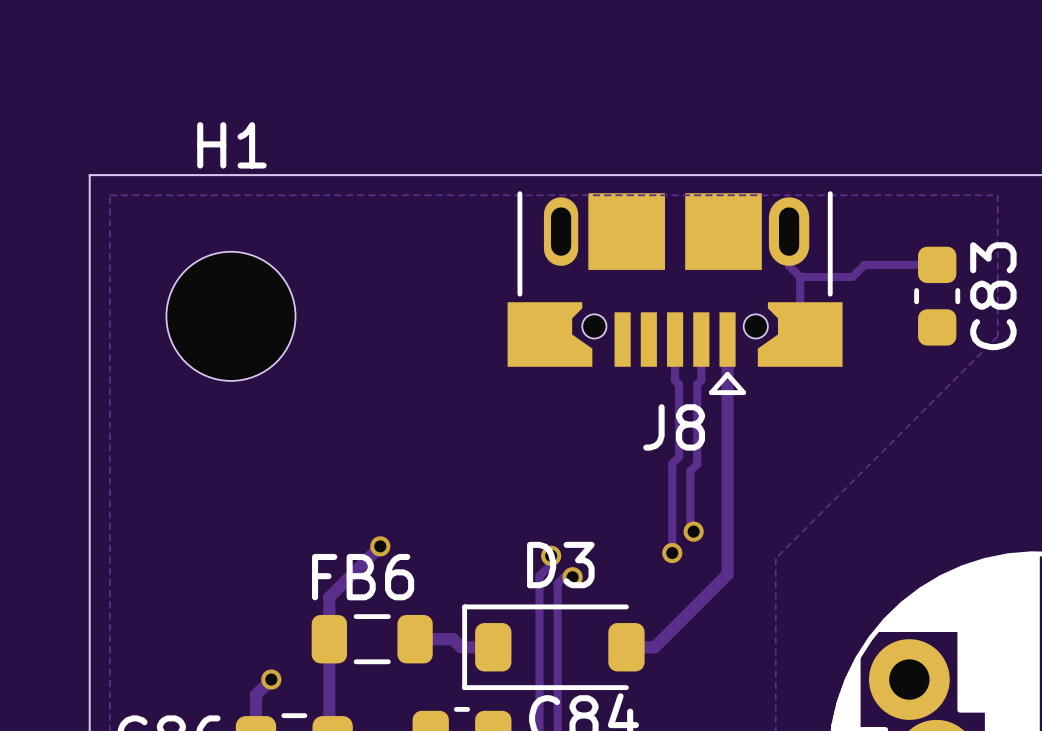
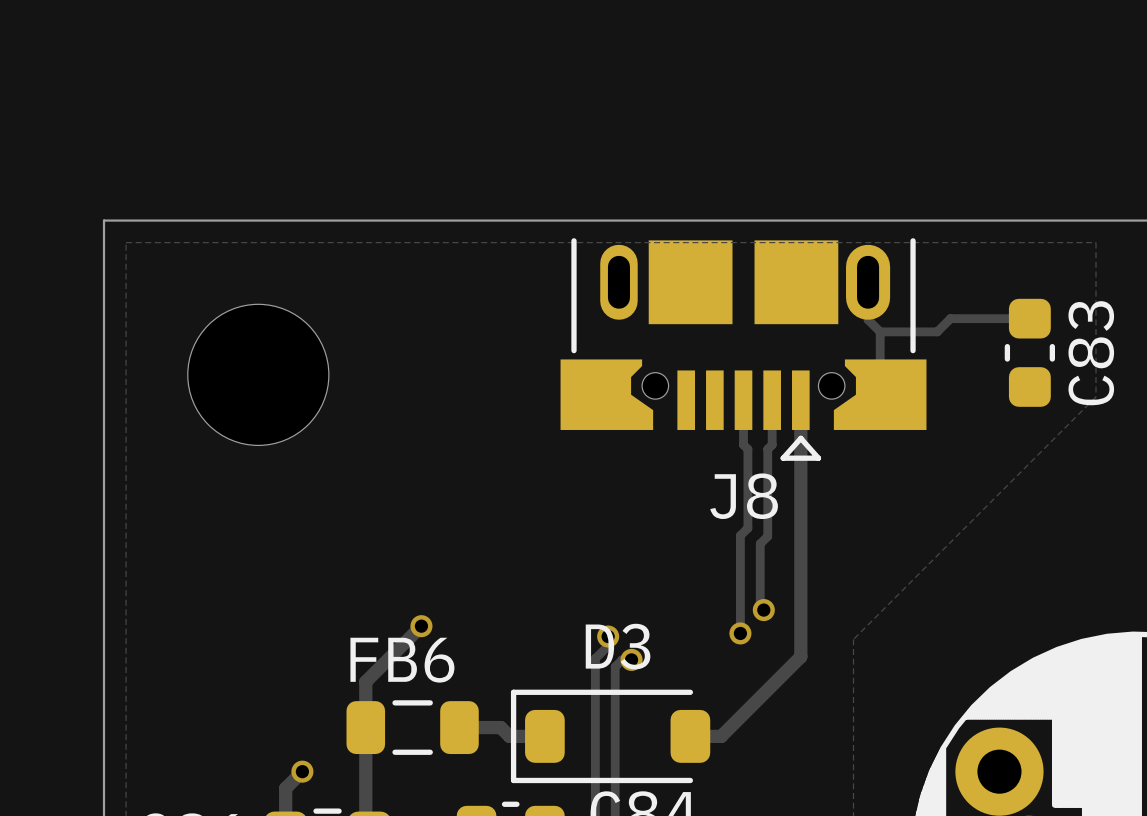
H1 name: H1 (231, 145) -> none

